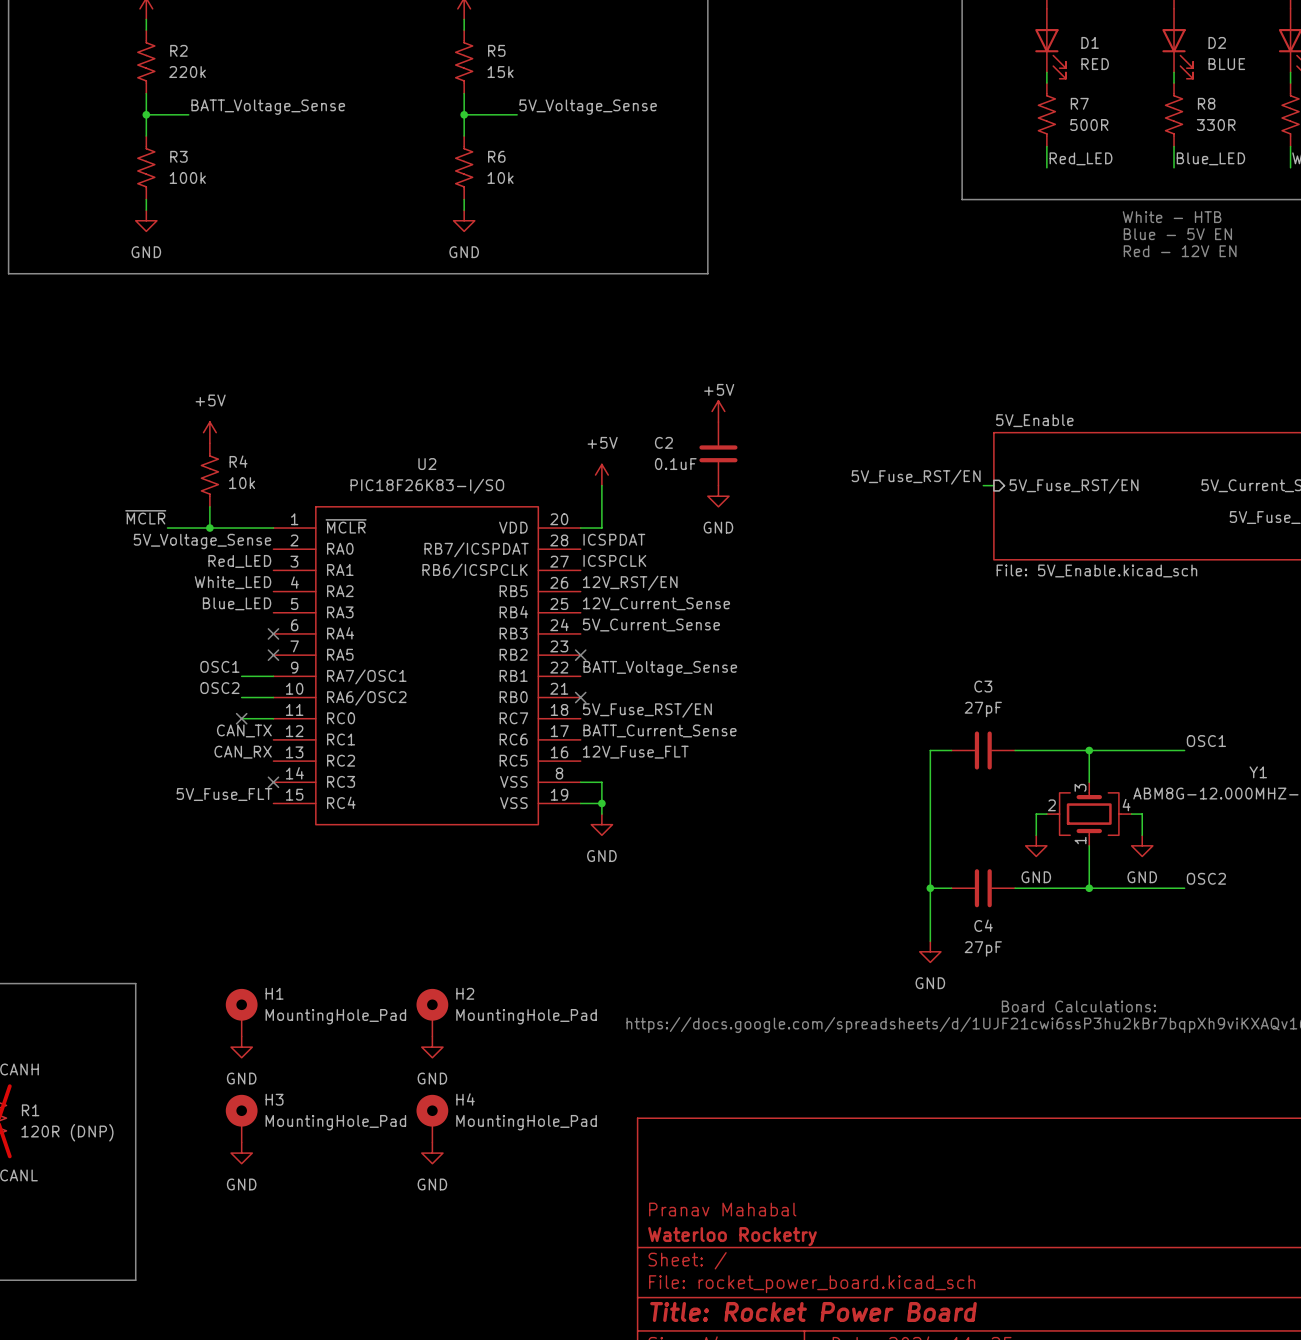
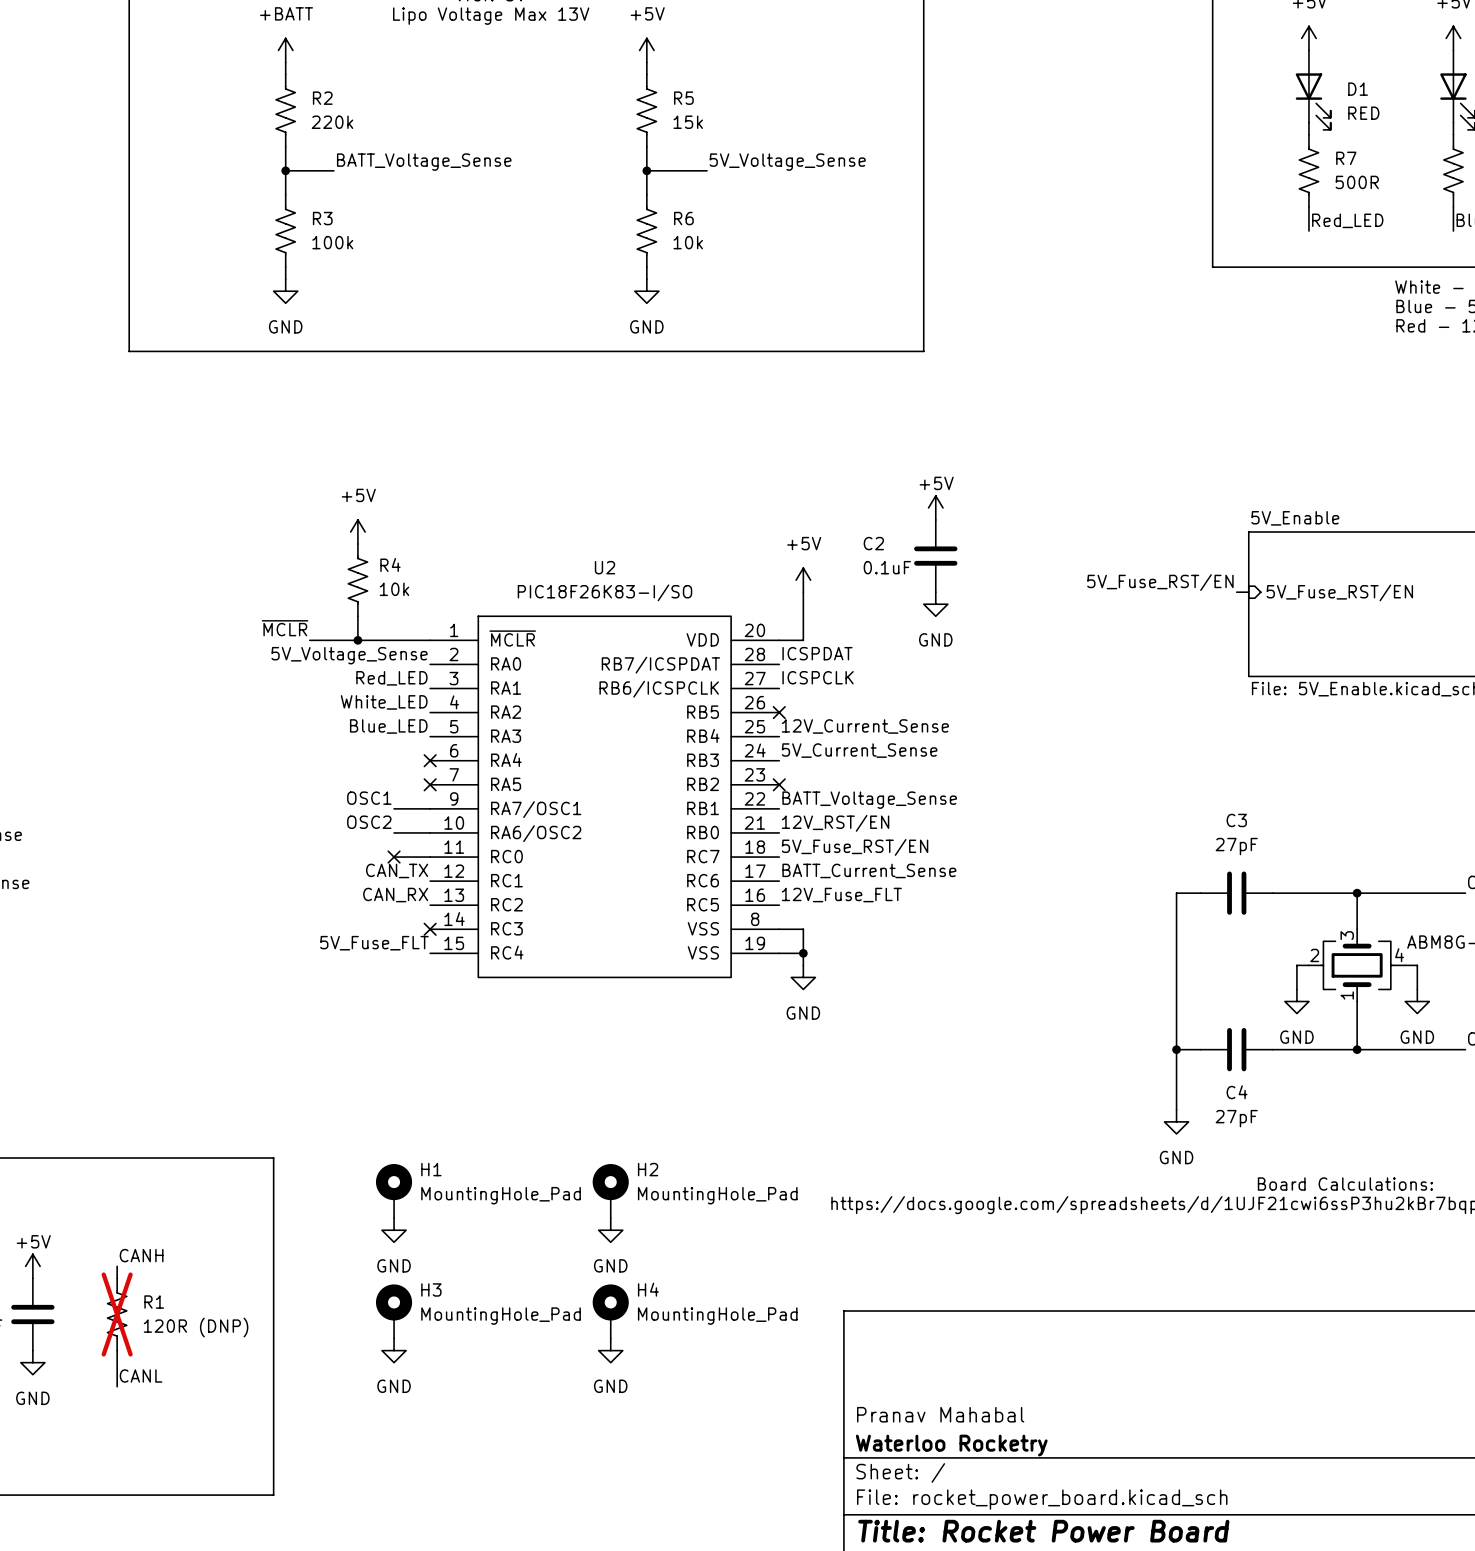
label position: 12V_RST/EN (630, 583) -> 12V_RST/EN (835, 823)
no-connect mark: none -> (779, 712)
no-connect mark: (580, 697) -> none

